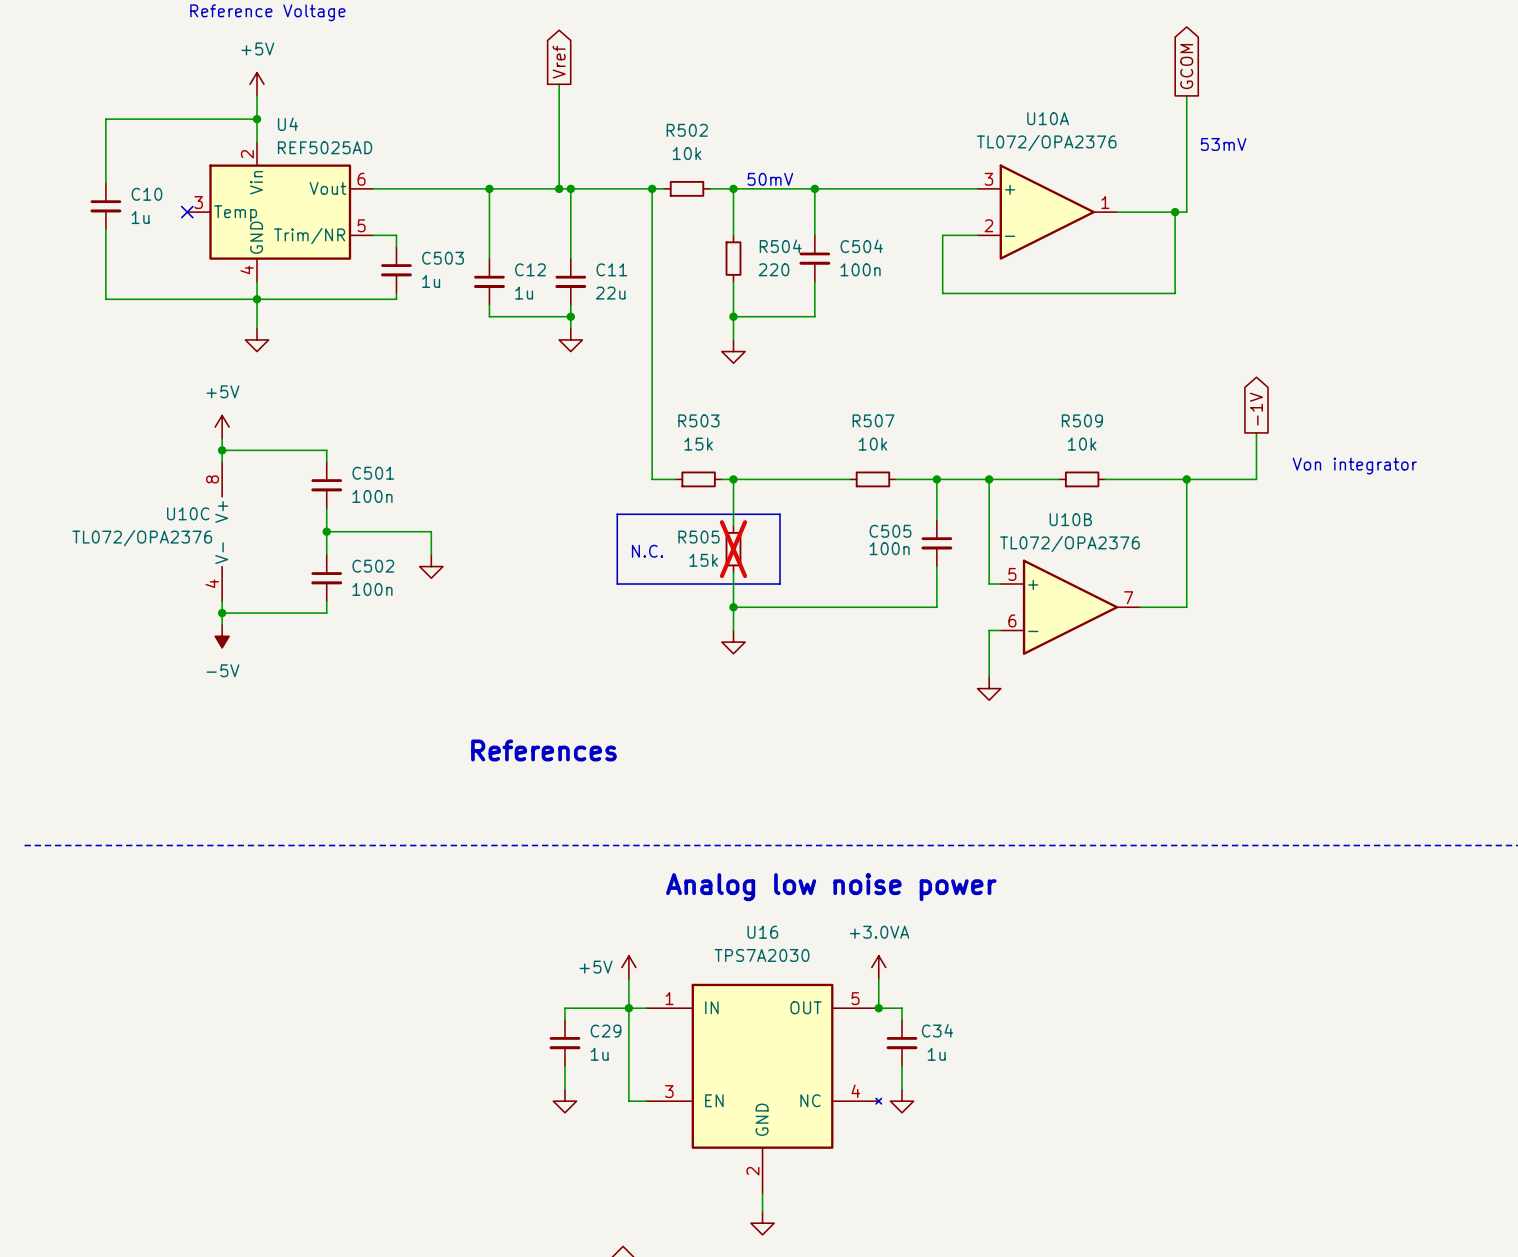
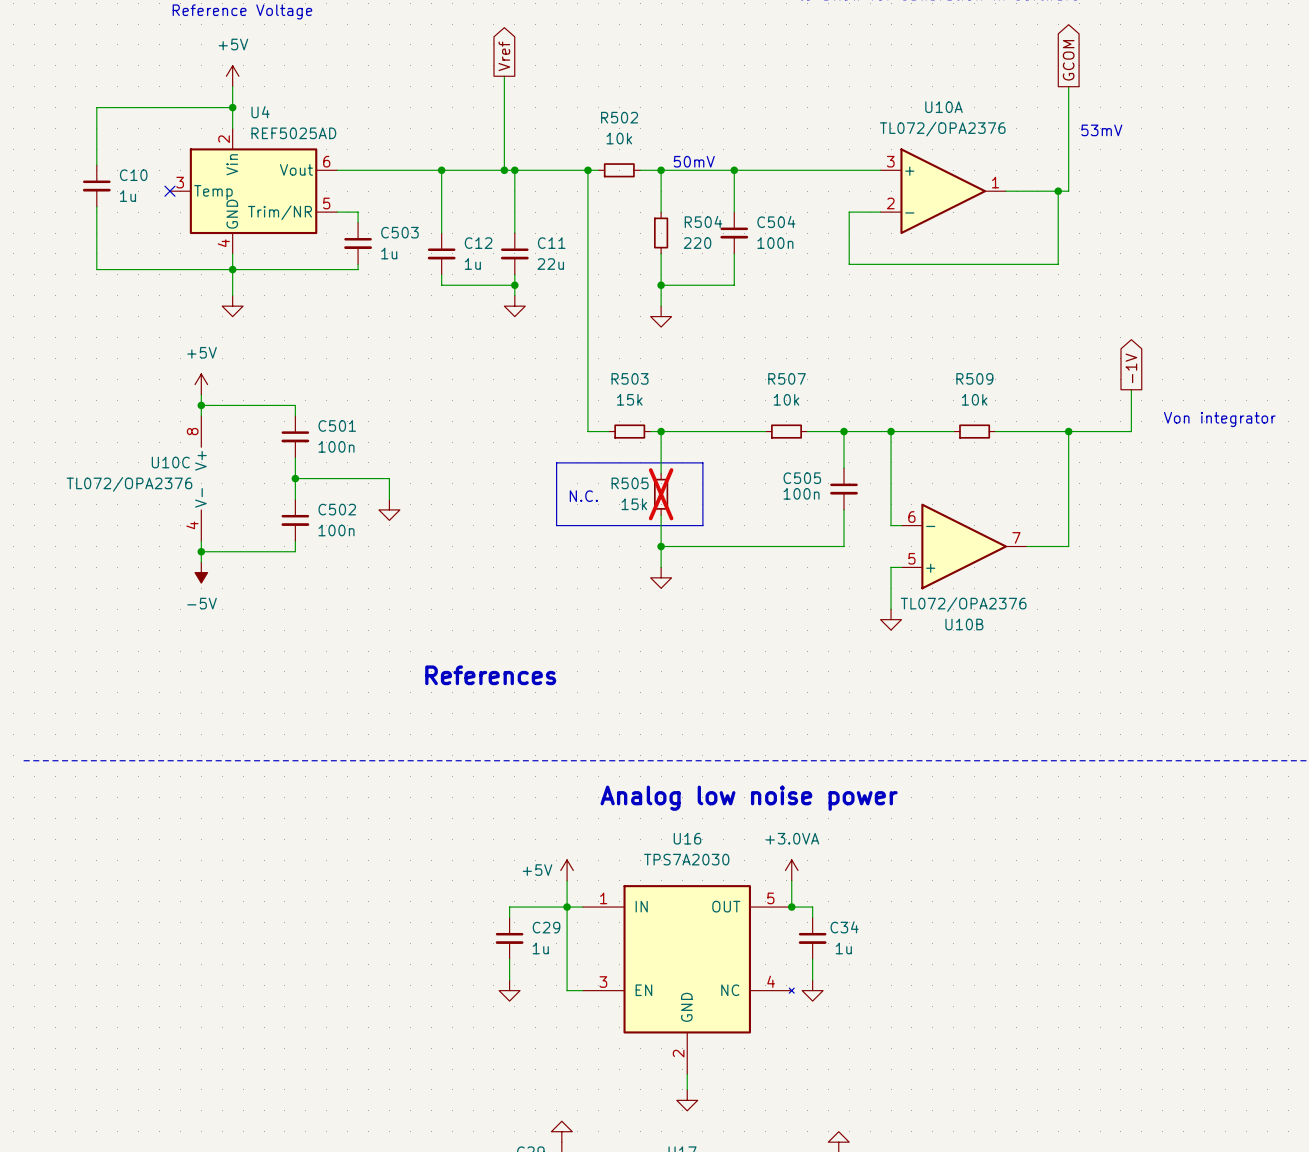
U10B flip: as is (1070, 607) -> up-down (964, 546)

